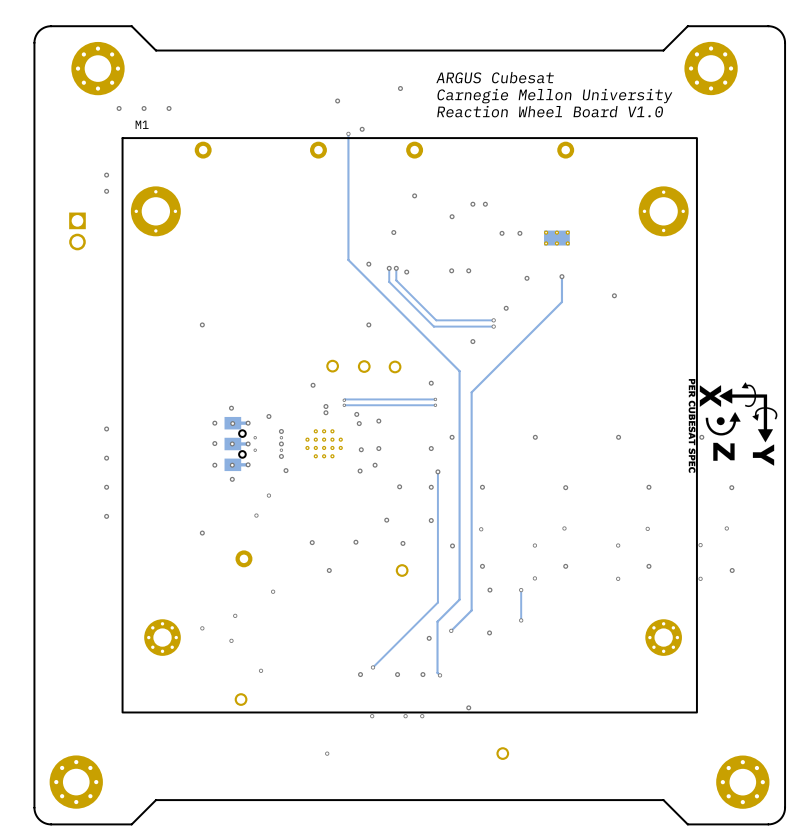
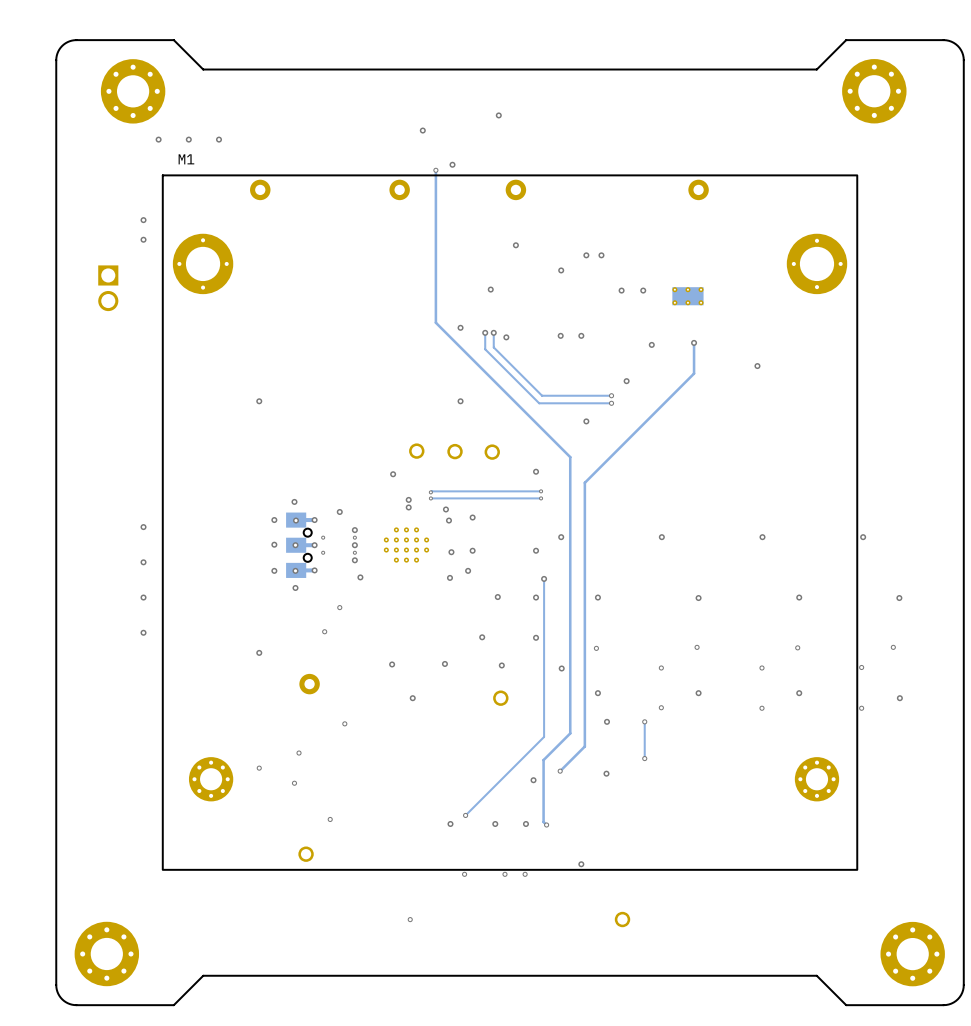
text: ARGUS Cubesat (495, 77) -> none
text: Carnegie Mellon University (554, 96) -> none
text: Reaction Wheel Board V1.0 (550, 111) -> none
drawing: [688, 378, 778, 473] -> none

